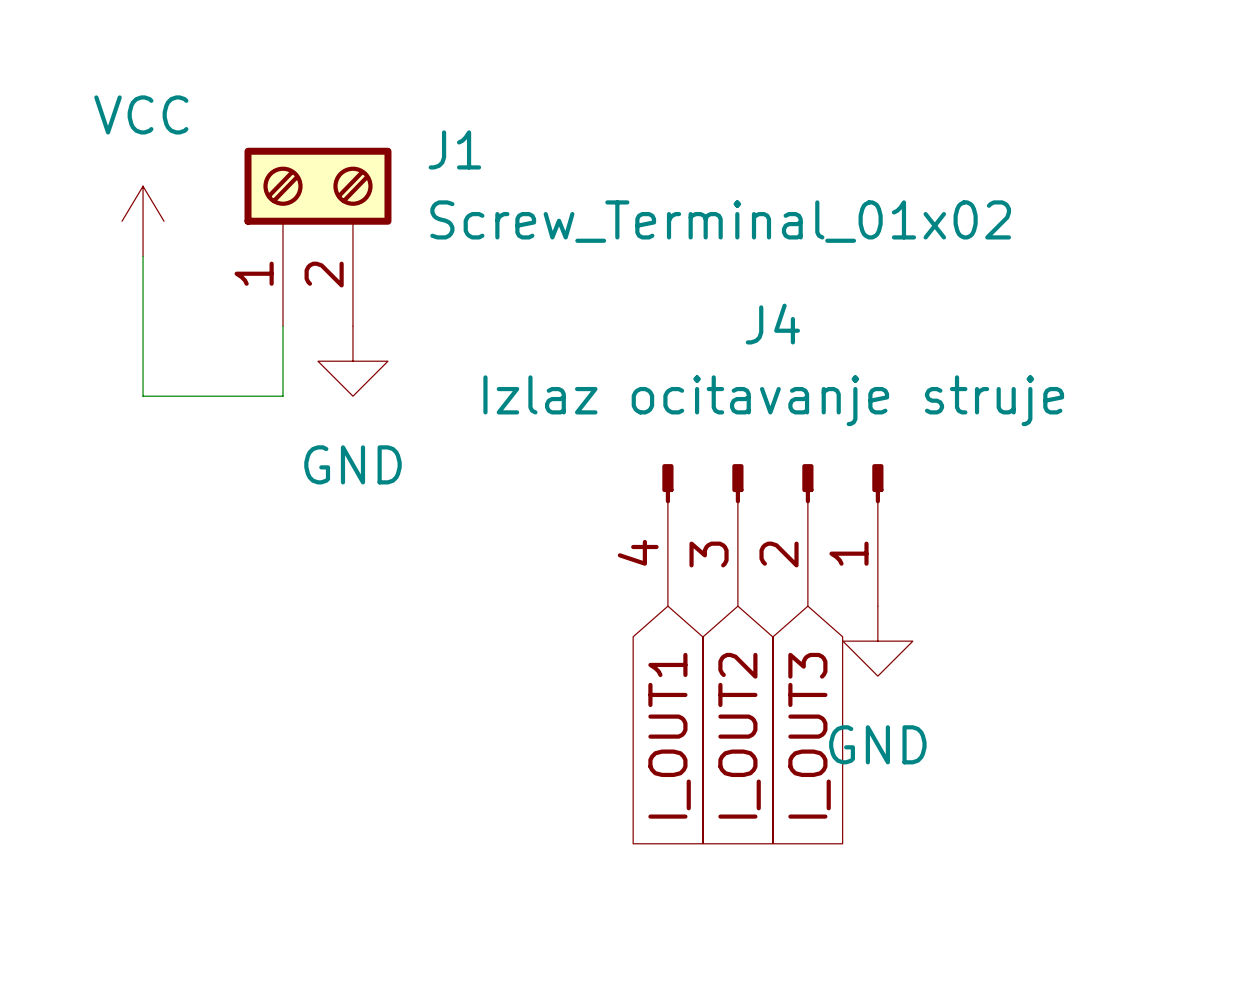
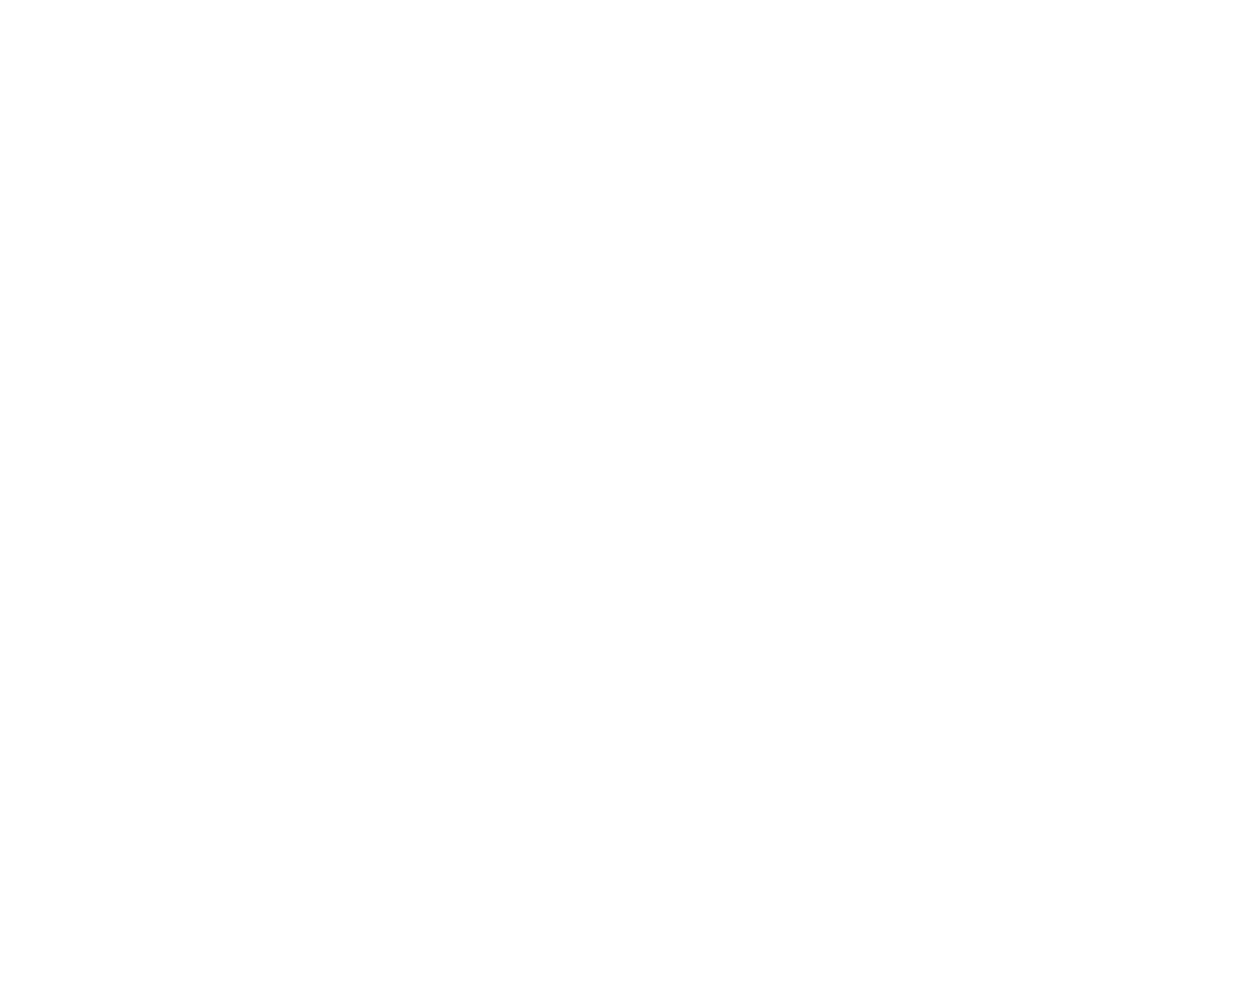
power symbol: VCC (143, 221) -> none
J1: Screw_Terminal_01x02 (317, 236) -> none
wire: (143, 256) (143, 396) (283, 396) (283, 326) -> none
power symbol: GND (352, 361) -> none
J4: Izlaz ocitavanje struje (772, 535) -> none
power symbol: GND (877, 641) -> none
global label: I_OUT1 (669, 735) -> none
global label: I_OUT2 (739, 735) -> none
global label: I_OUT3 (809, 735) -> none

